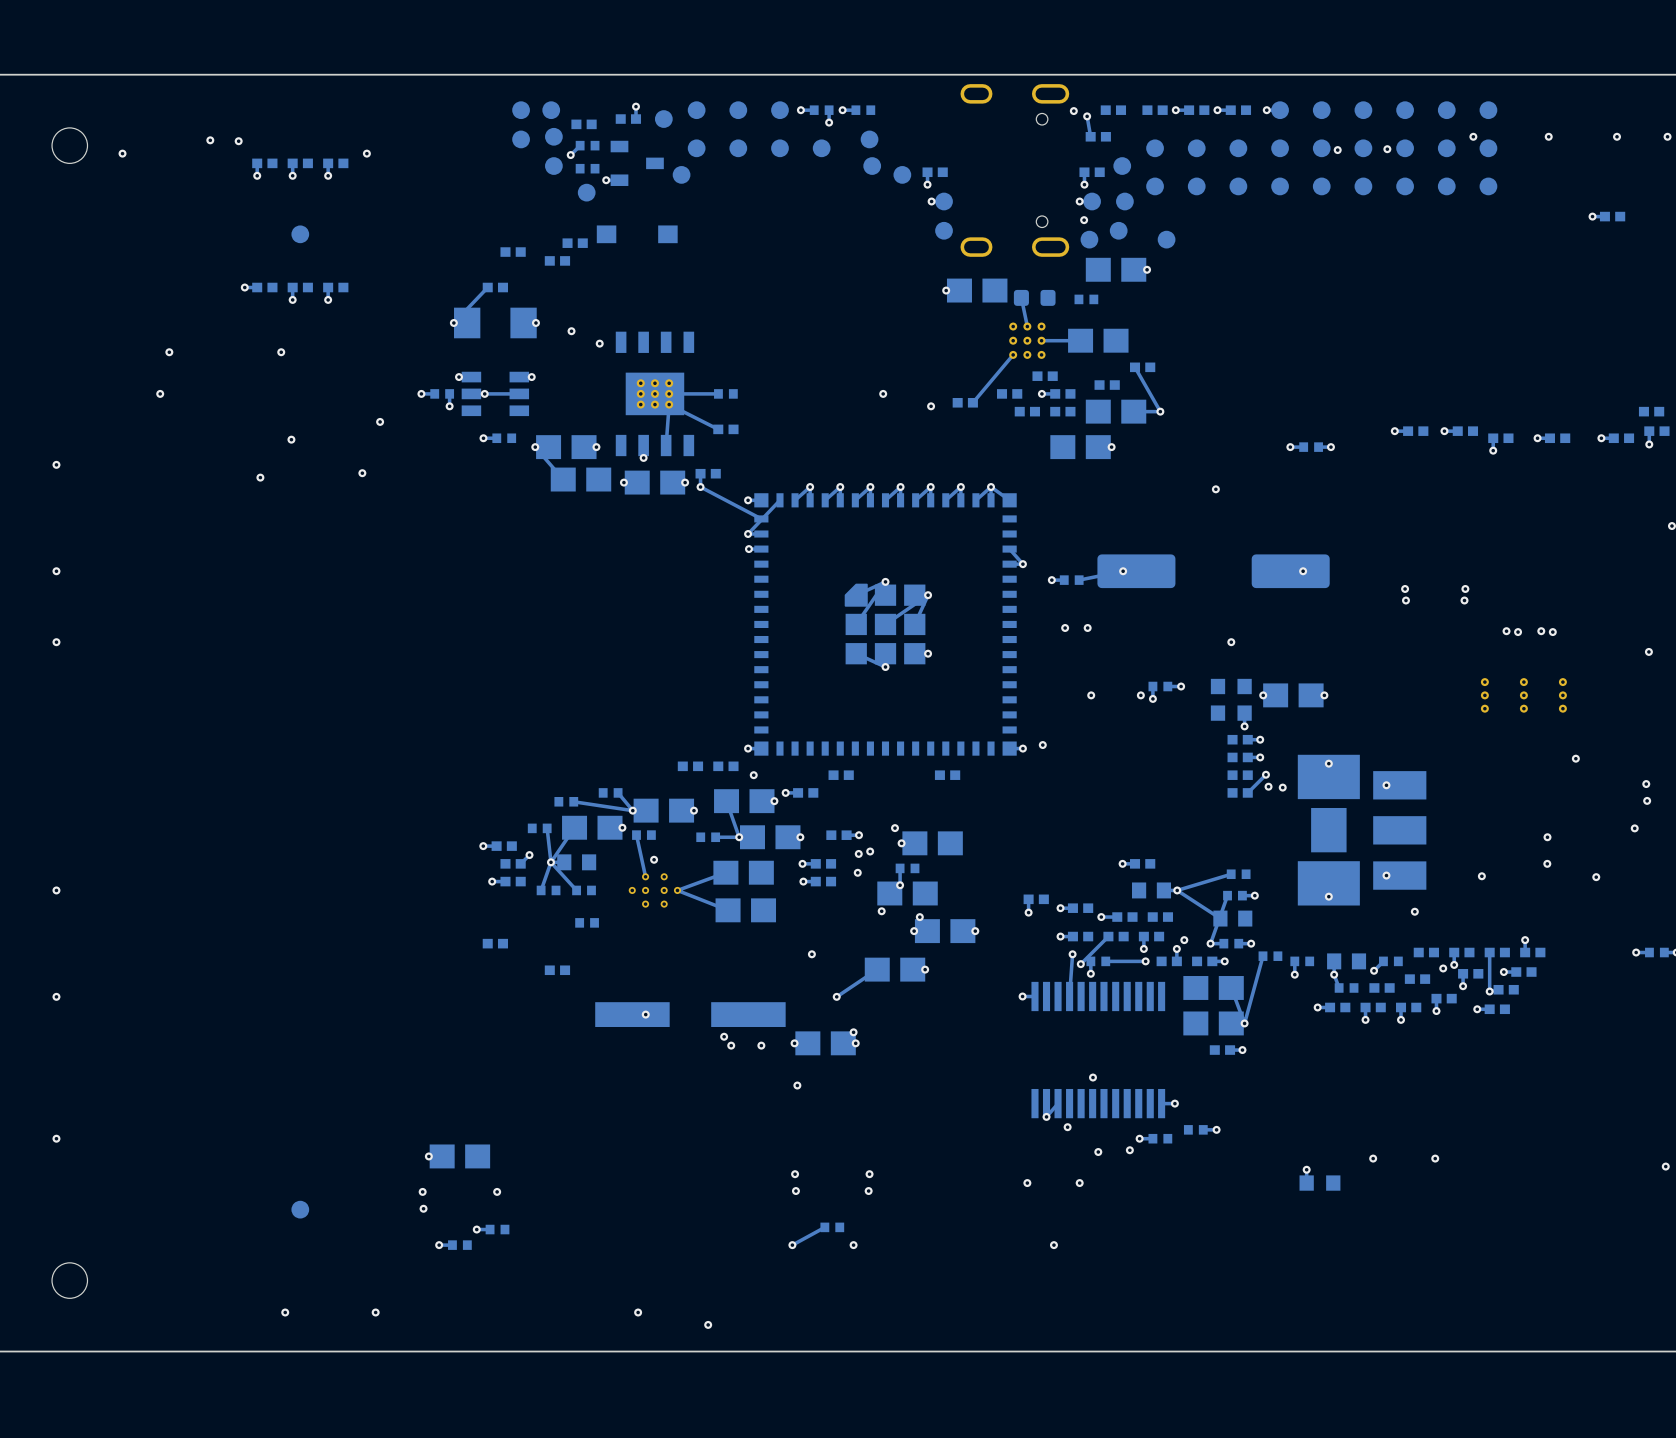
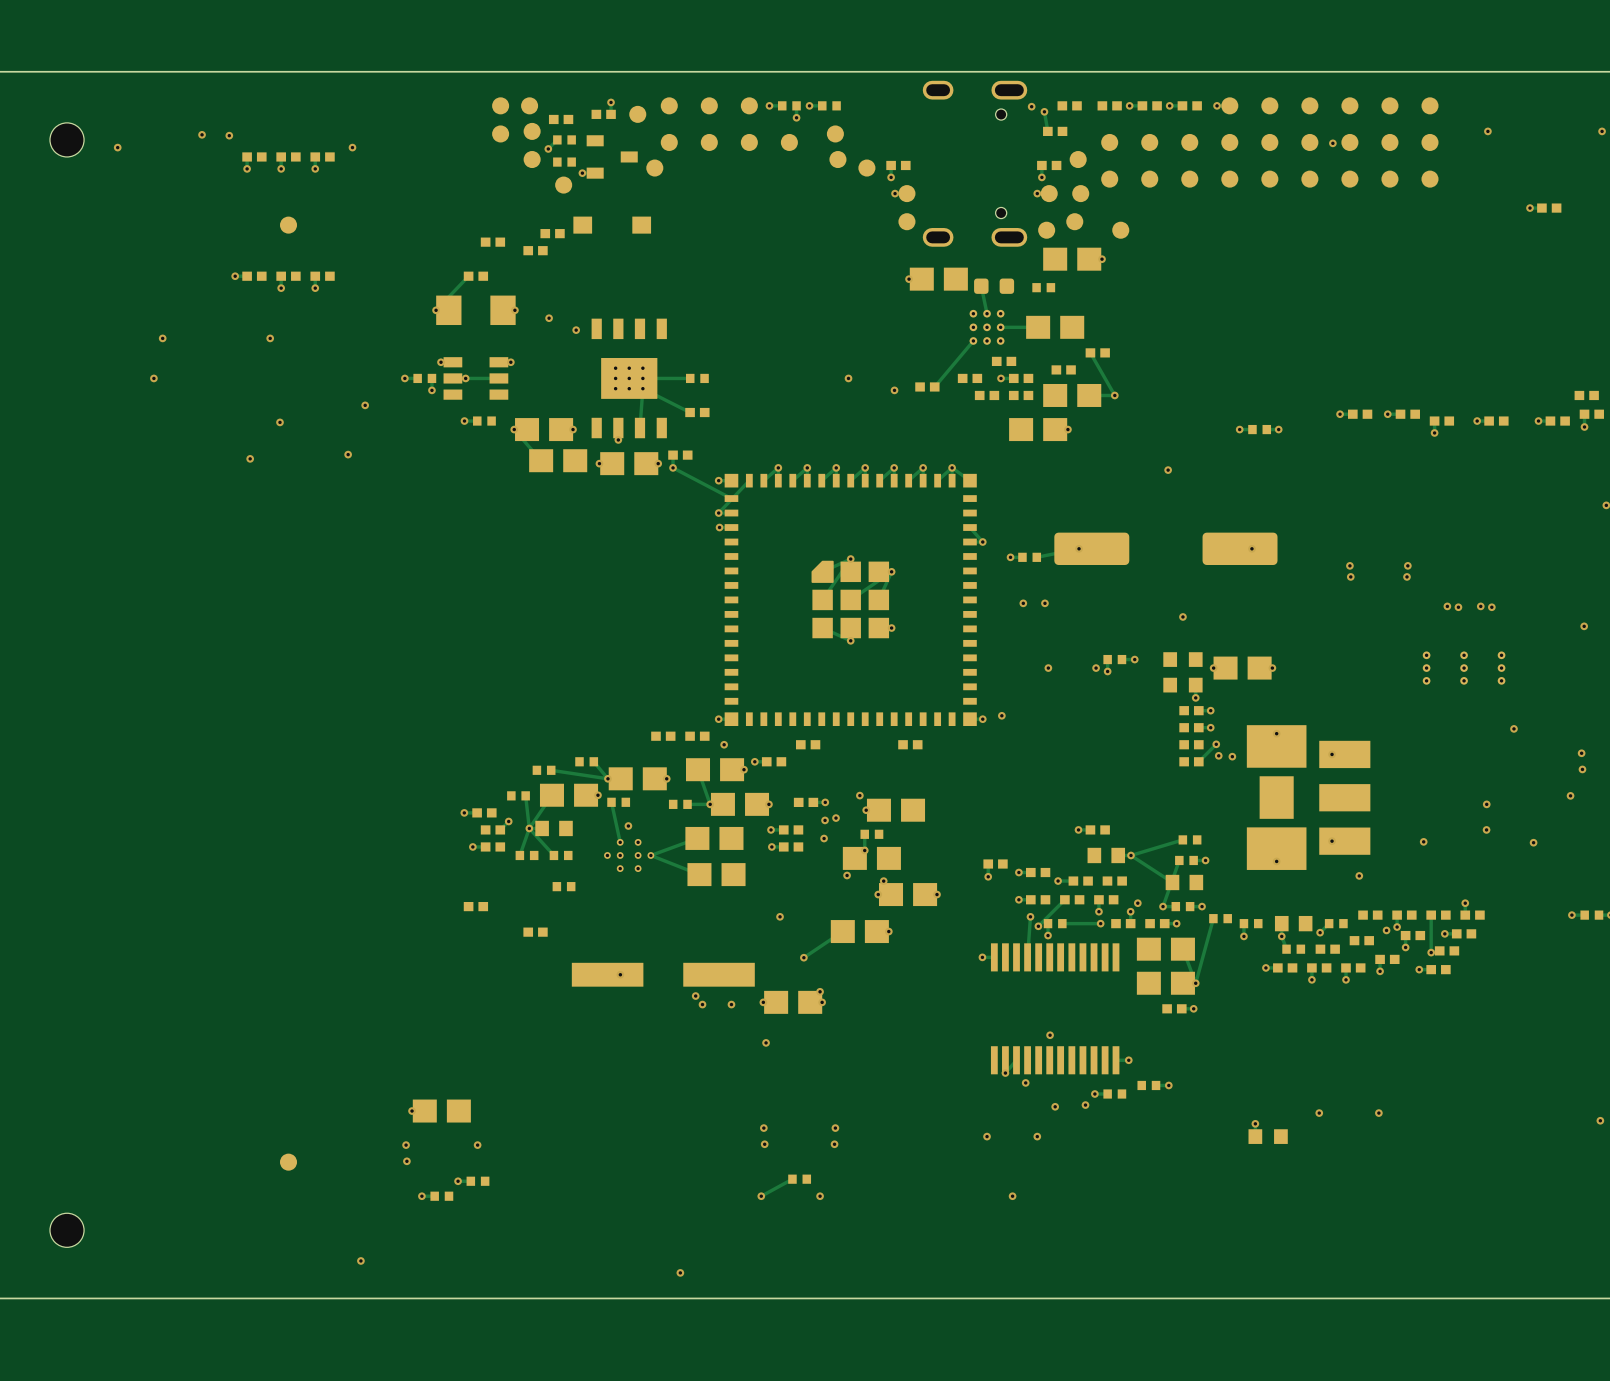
via: (1473, 136) -> none
via: (1617, 136) -> none
via: (1337, 150) -> none
via: (1084, 220) -> none
via: (56, 464) -> none
via: (56, 571) -> none
via: (56, 642) -> none
via: (56, 890) -> none
via: (56, 996) -> none
via: (56, 1138) -> none
via: (285, 1312) -> none
via: (638, 1312) -> none

